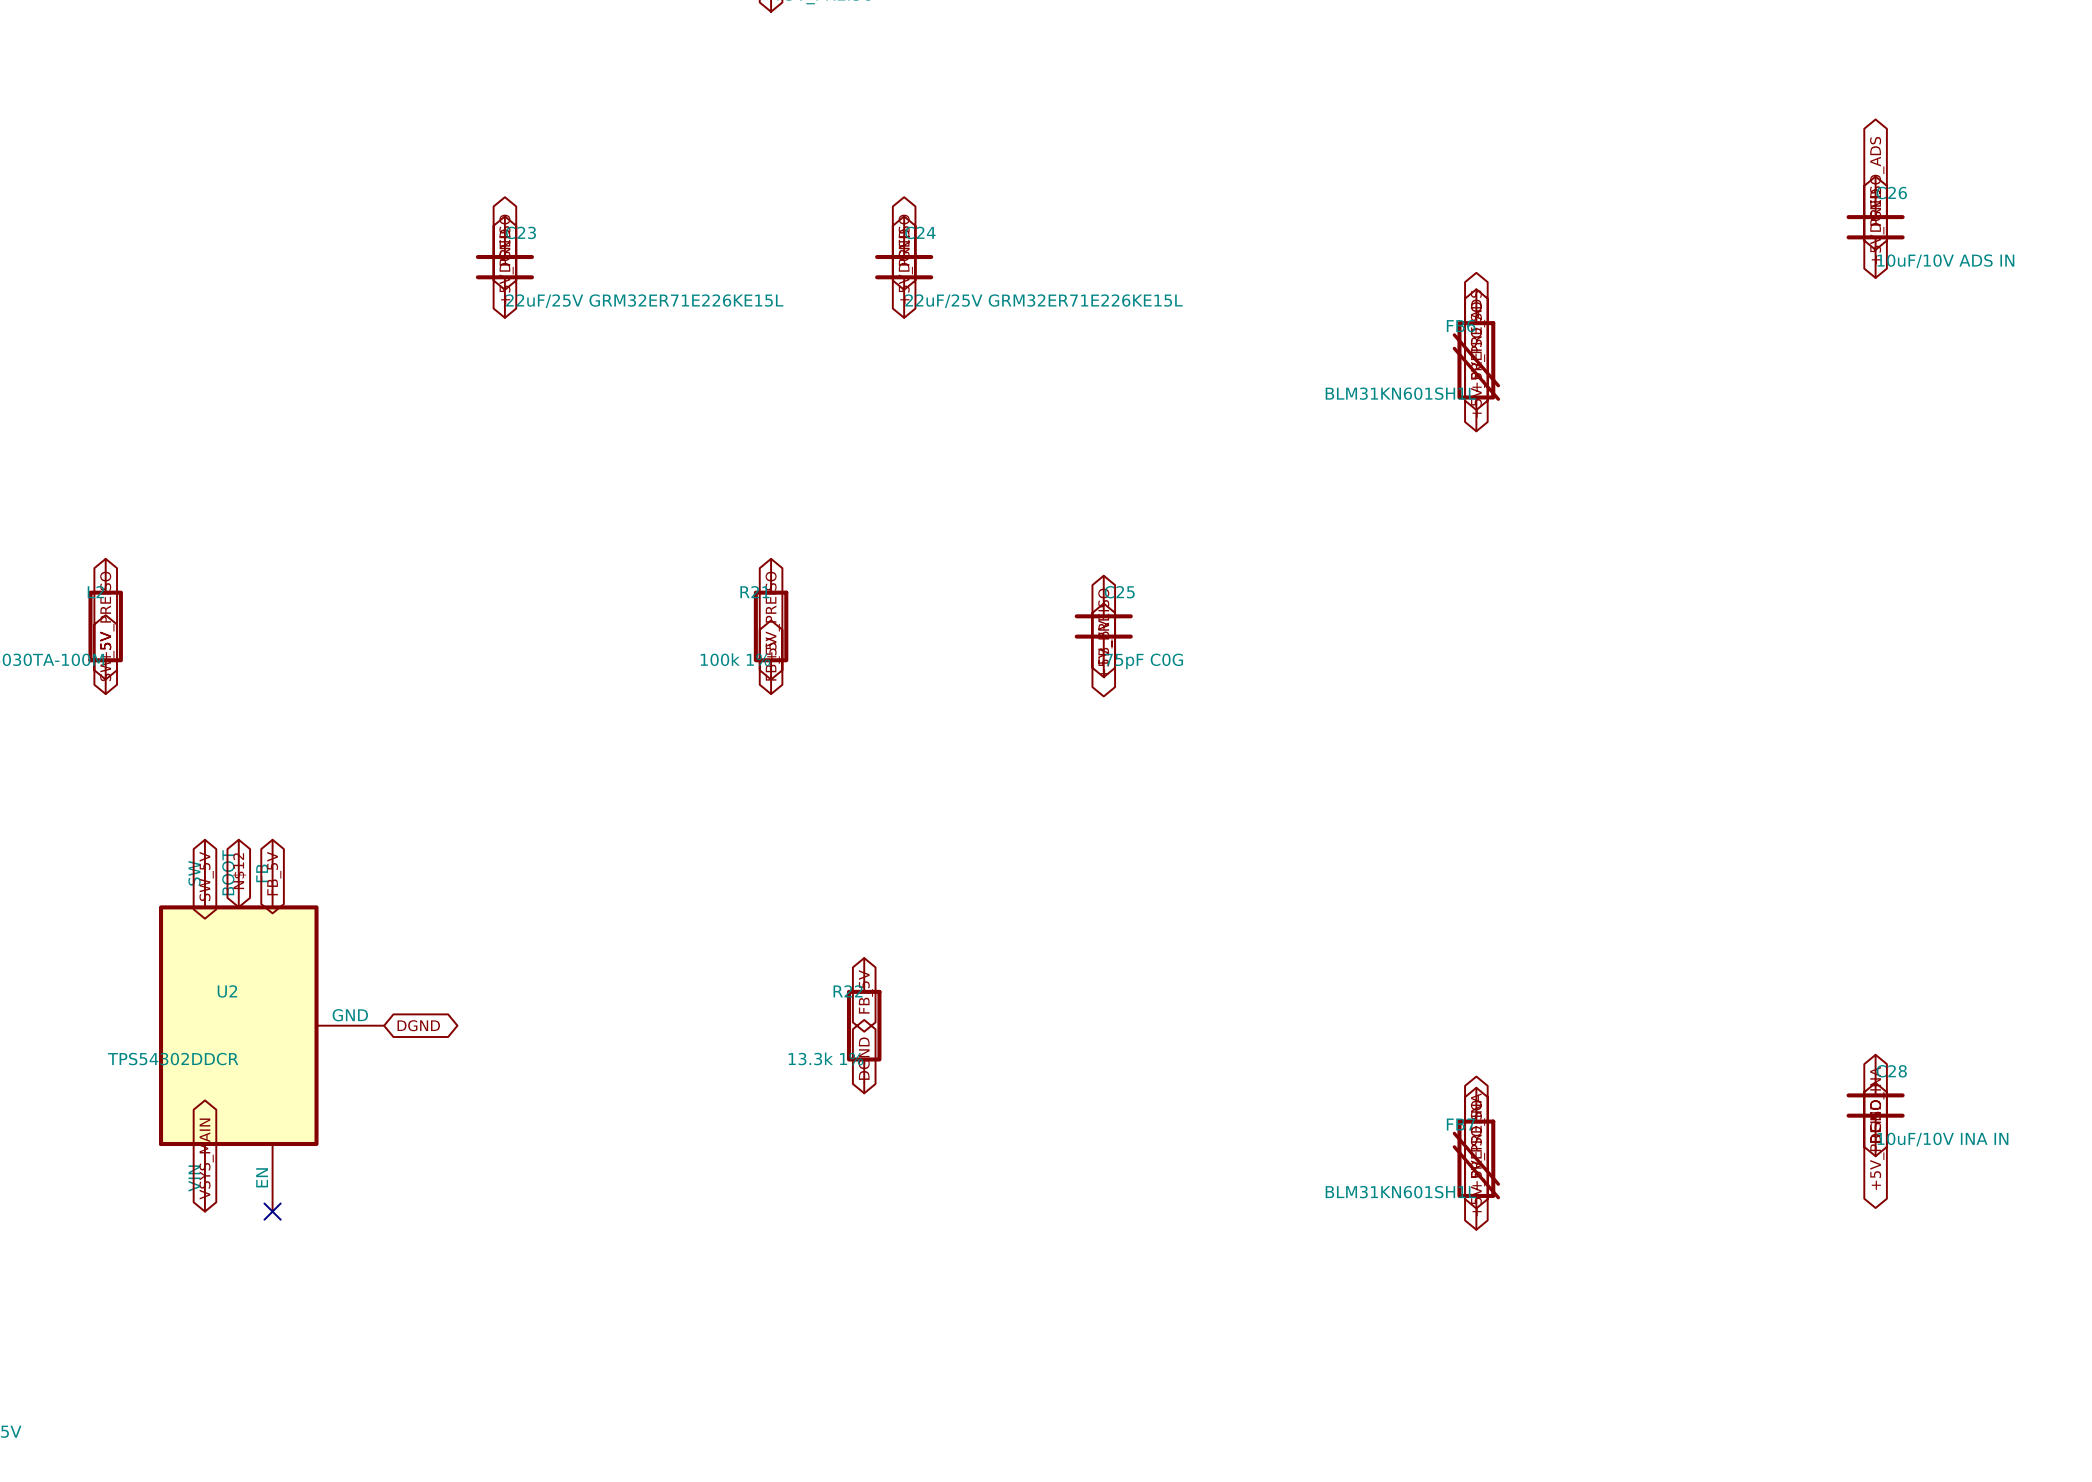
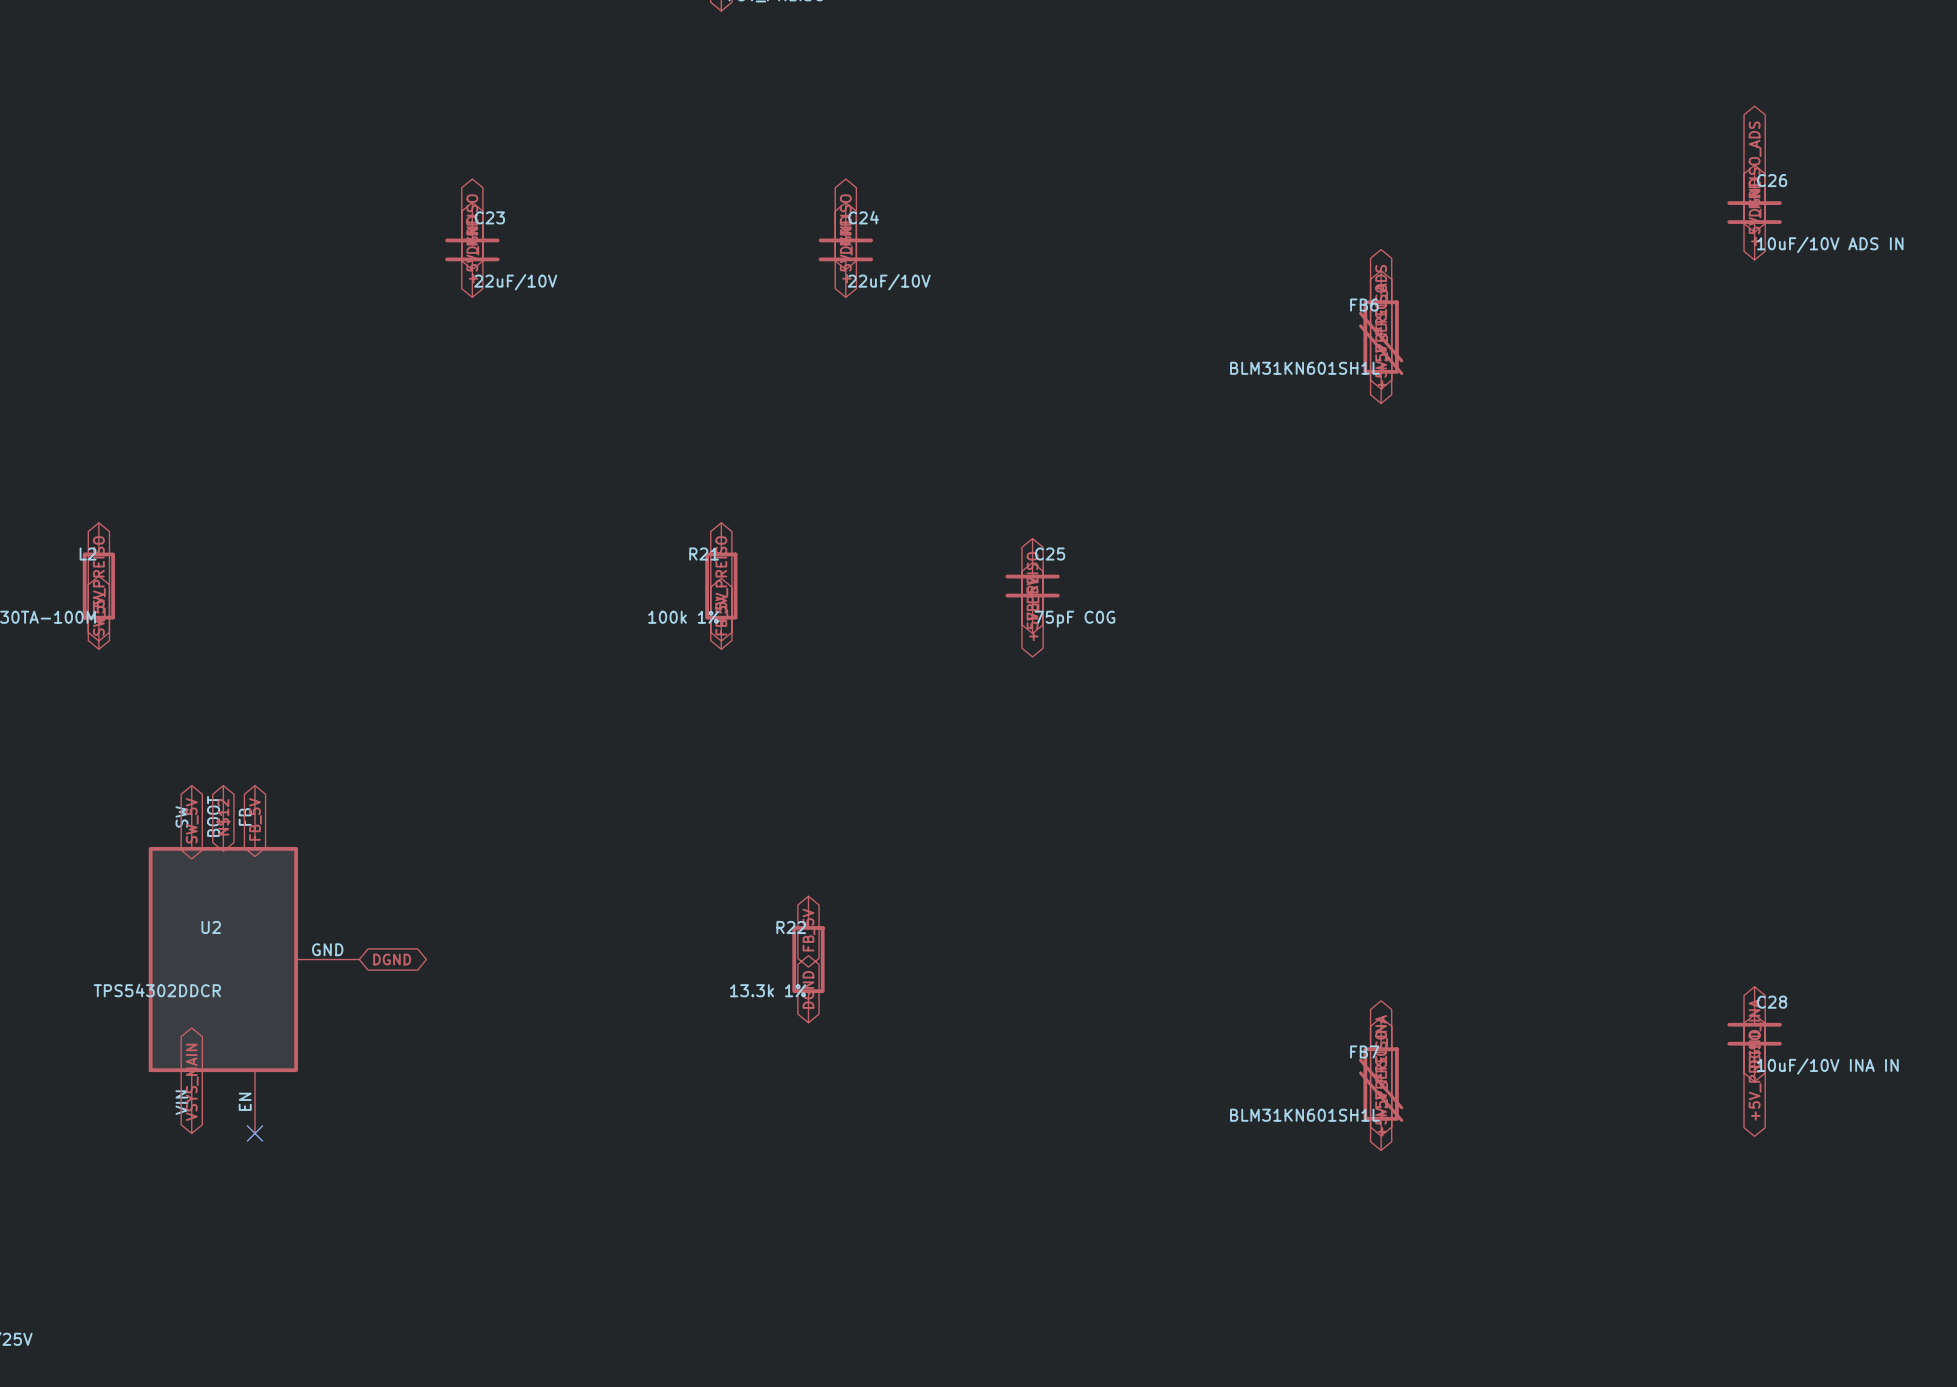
C23 value: 22uF/25V GRM32ER71E226KE15L (644, 301) -> 22uF/10V (515, 282)
C24 value: 22uF/25V GRM32ER71E226KE15L (1043, 301) -> 22uF/10V (889, 282)

